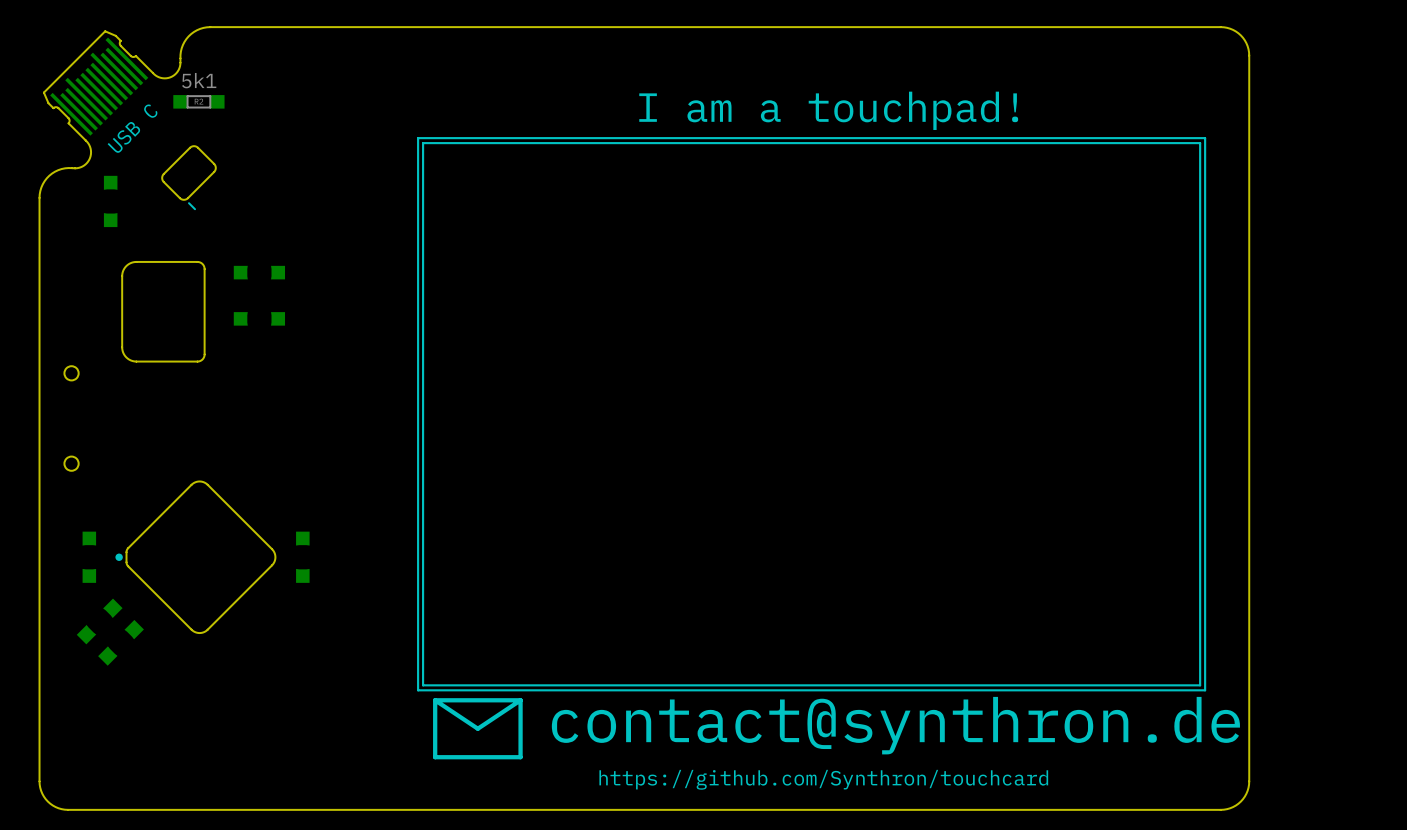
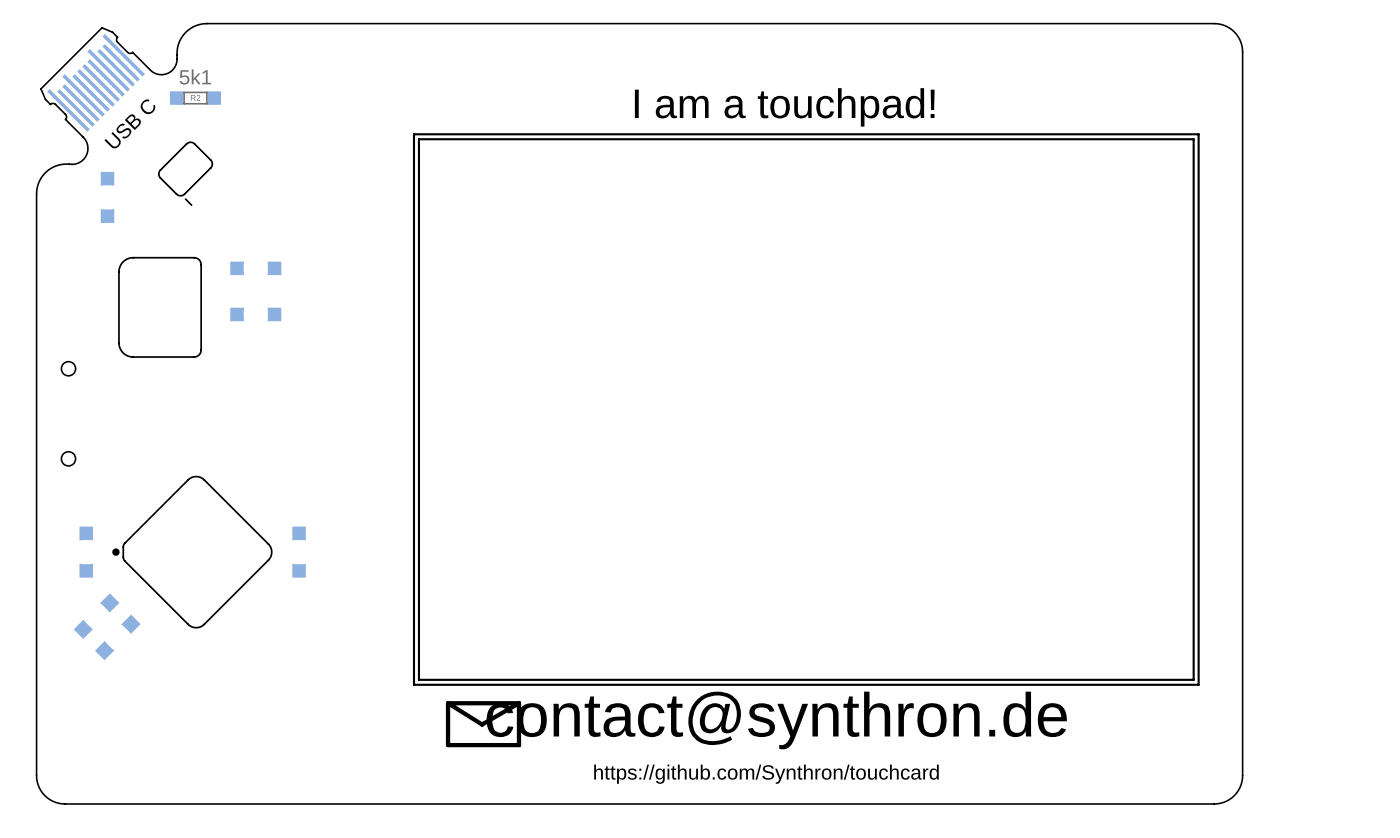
line: (520, 700) (477, 728) (435, 700) -> none
line: (520, 700) (435, 700) -> none
line: (520, 700) (520, 757) (435, 757) (435, 700) -> none
line: none -> (518, 703) (482, 724) (448, 703)
line: none -> (518, 703) (448, 703)
line: none -> (518, 703) (518, 745) (448, 745) (448, 703)

